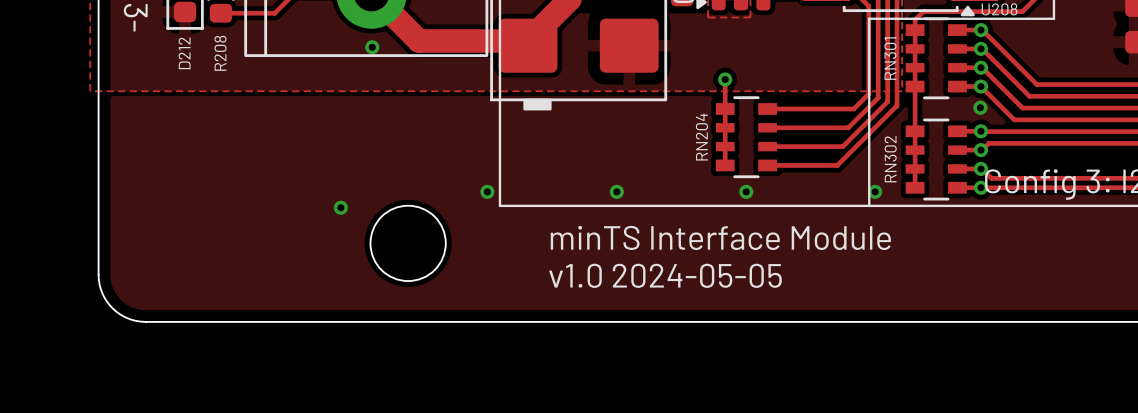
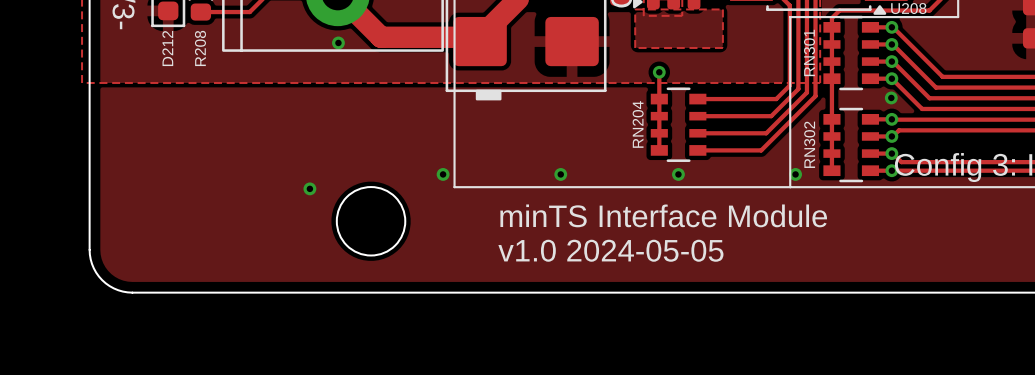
zone outline: none -> (635, 9) (722, 9) (722, 47) (635, 47) (635, 9)

